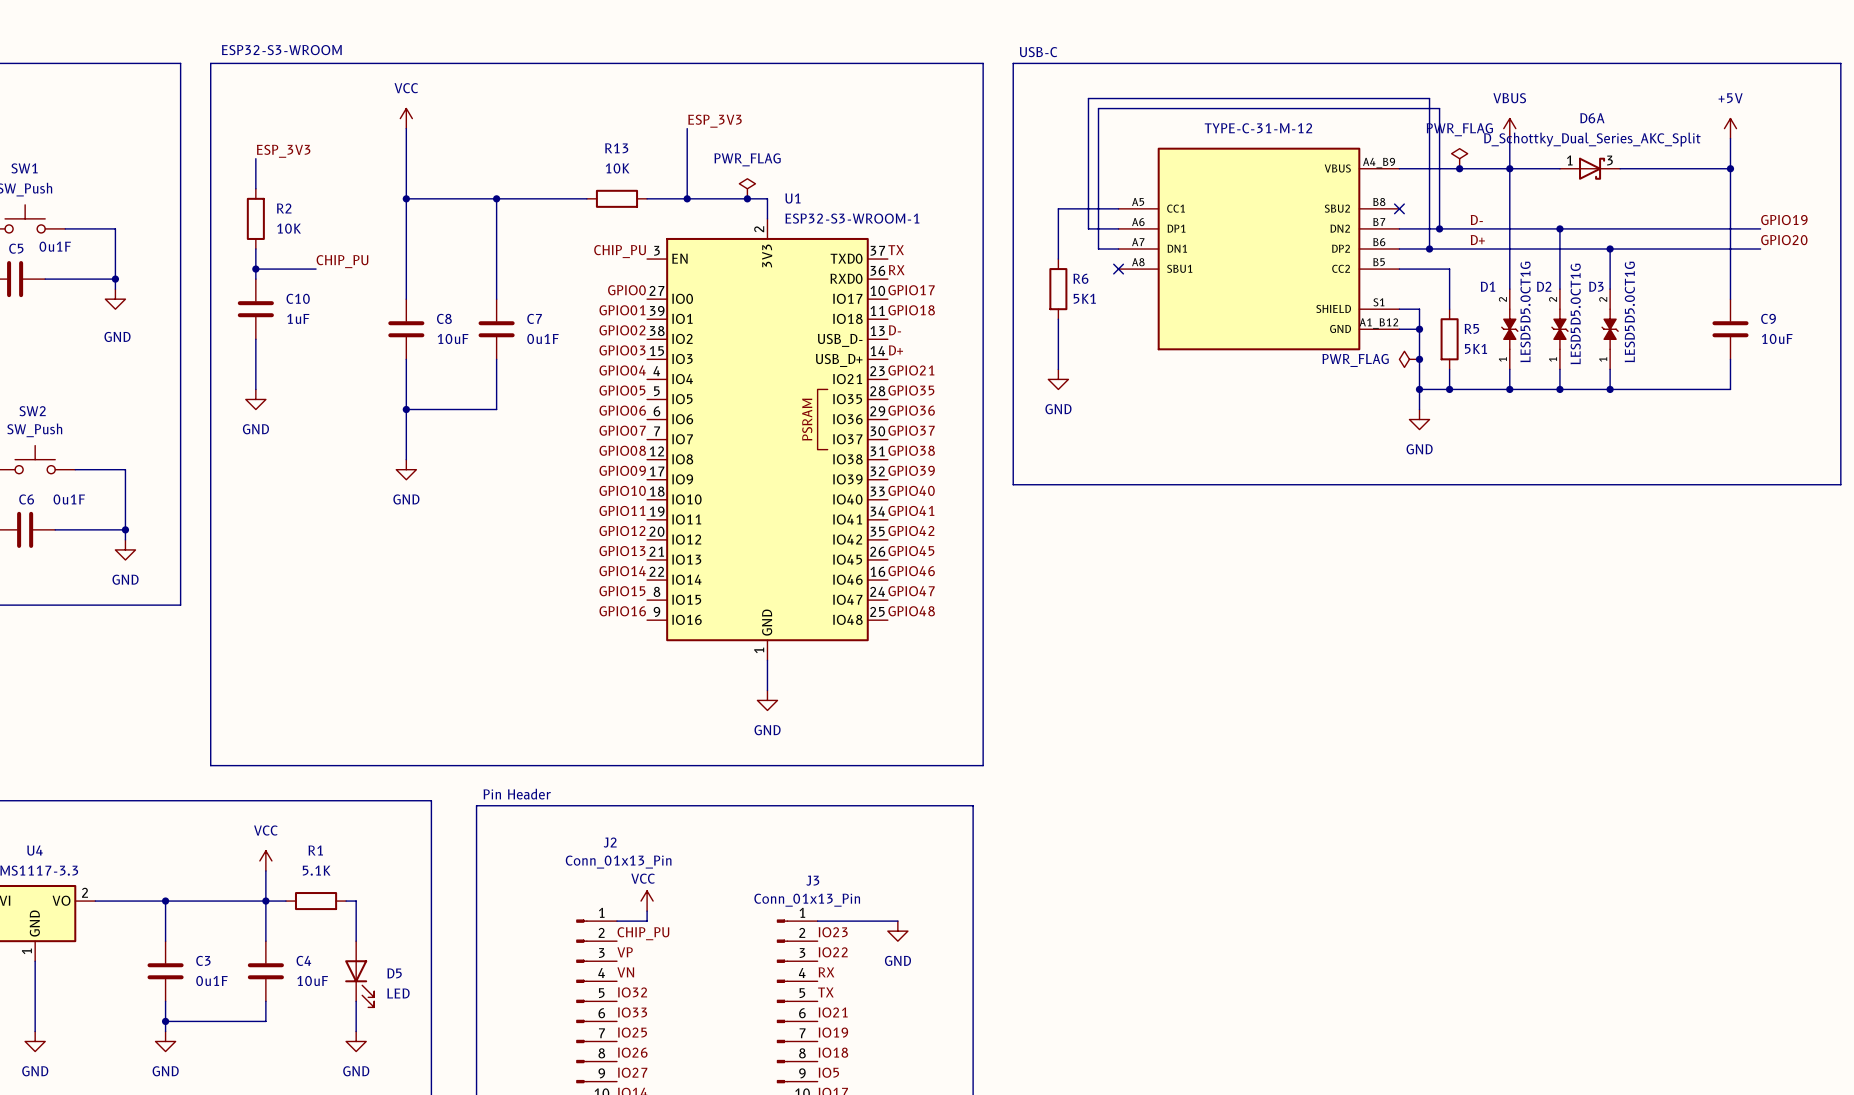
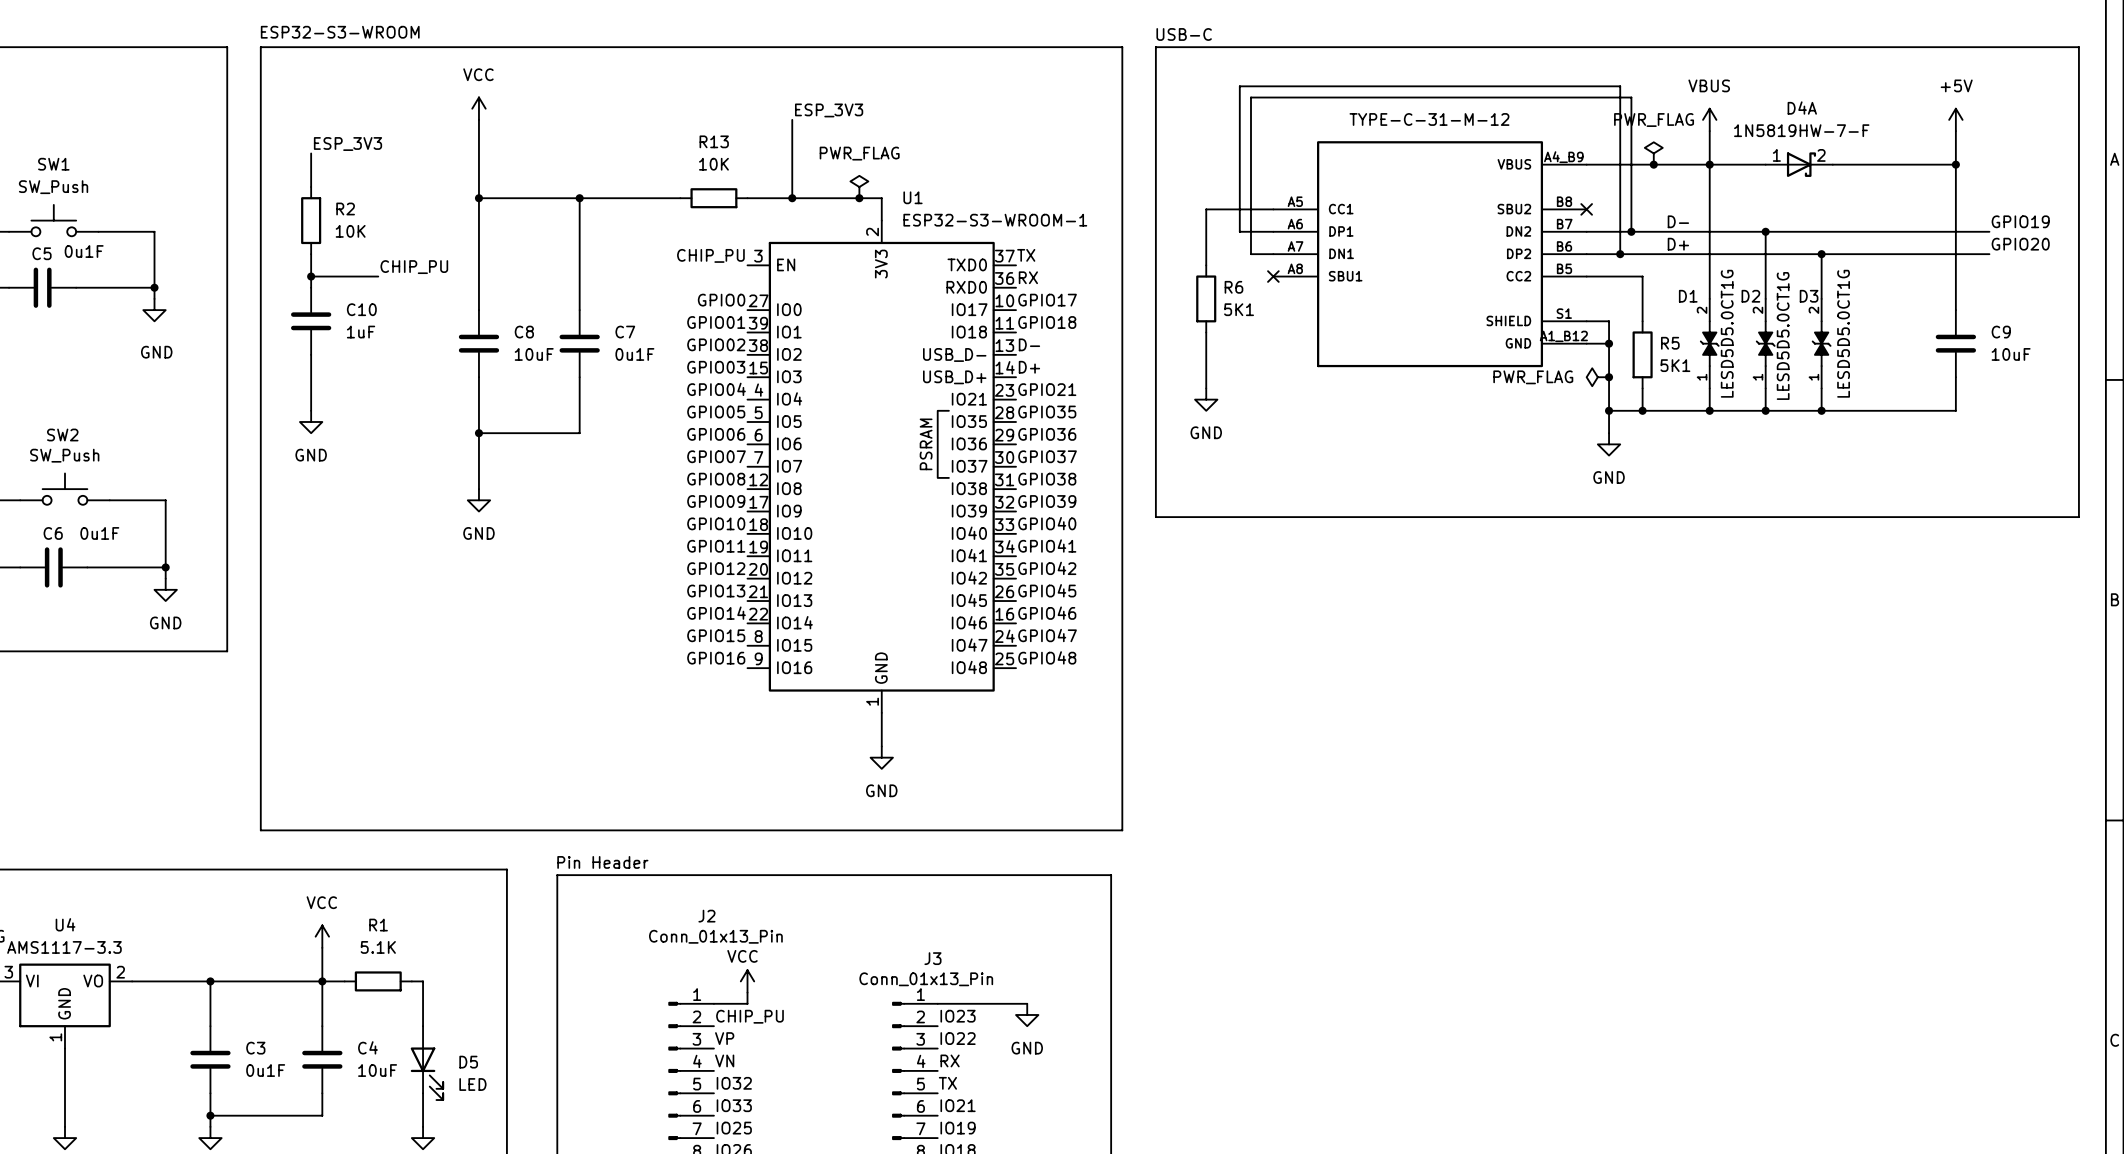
D6A name: D6A (1592, 118) -> D4A (1802, 108)
D6A value: D_Schottky_Dual_Series_AKC_Split (1592, 139) -> 1N5819HW-7-F (1801, 130)
D6A pin number: 3 (1609, 160) -> 2 (1821, 155)

